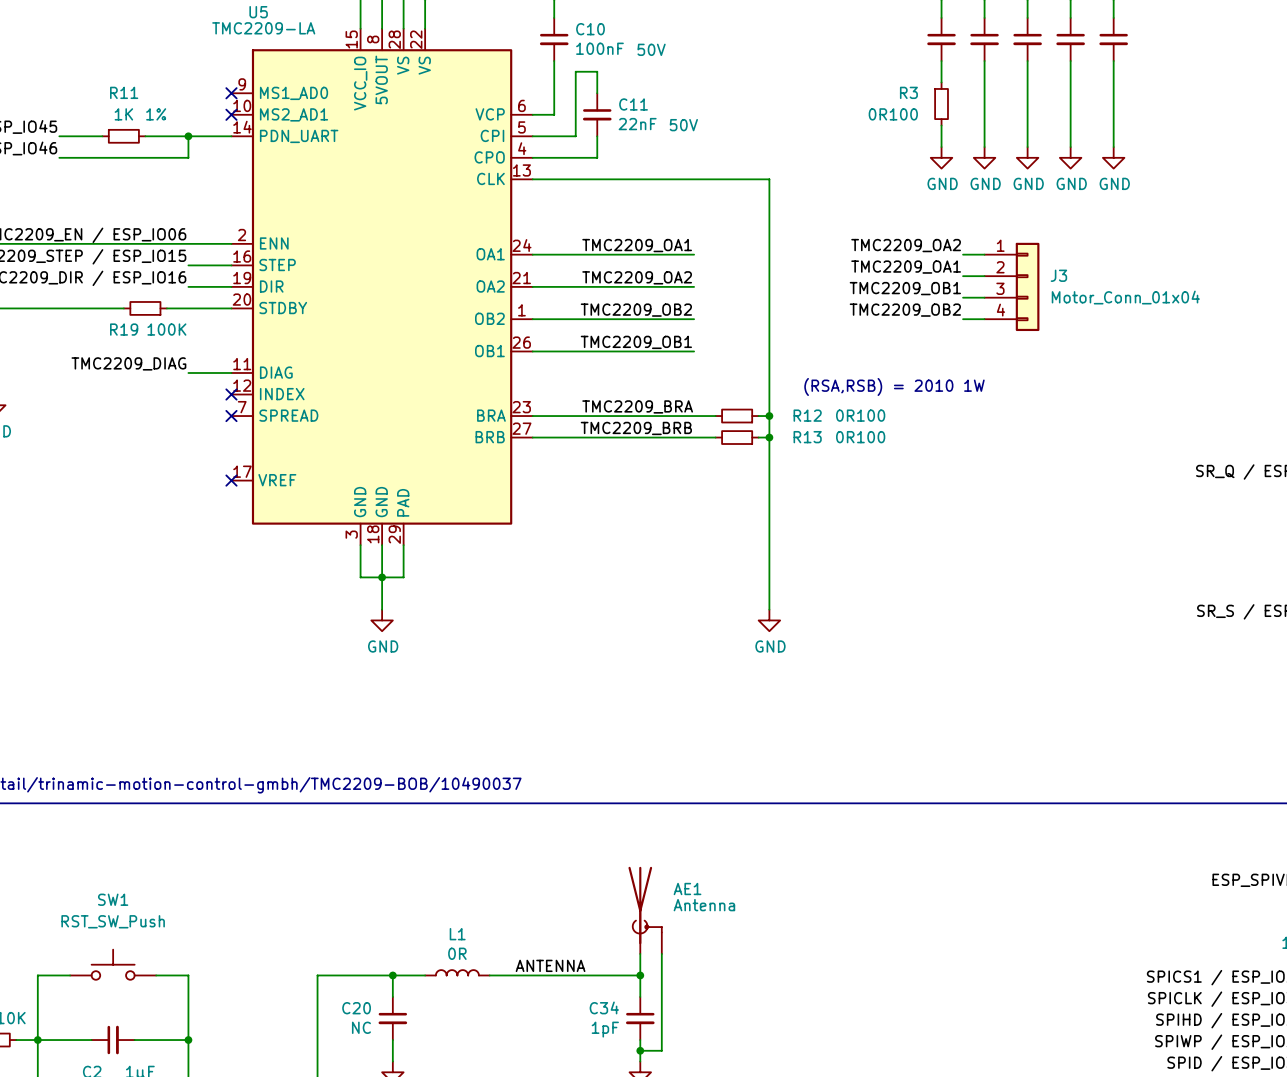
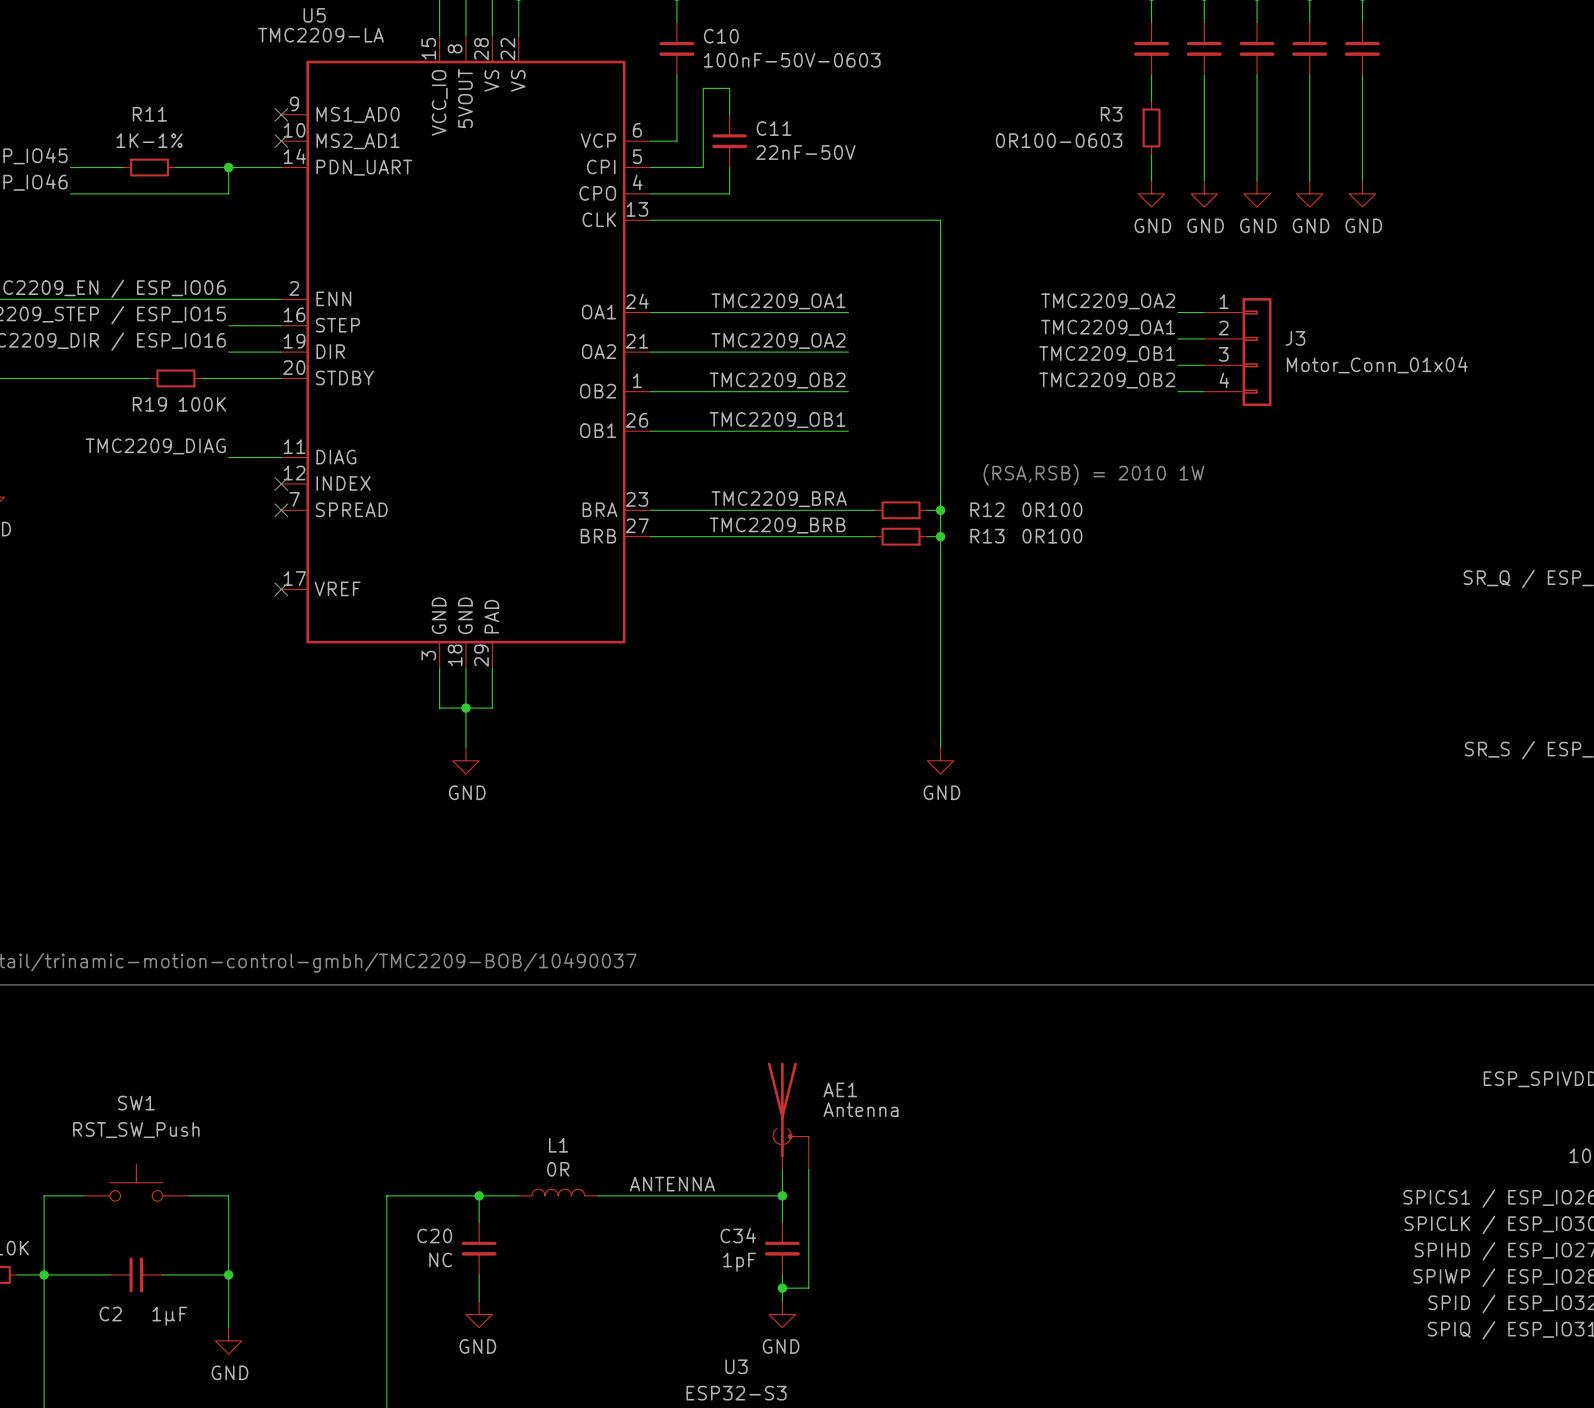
C10 value: 100nF (599, 48) -> 100nF-50V-0603 (792, 60)
C10 text: 50V (651, 49) -> none
R11 value: 1K (123, 114) -> 1K-1% (149, 140)
R11 text: 1% (156, 114) -> none
R3 value: 0R100 (893, 114) -> 0R100-0603 (1059, 140)
C11 value: 22nF (637, 124) -> 22nF-50V (805, 152)
C11 text: 50V (683, 125) -> none

